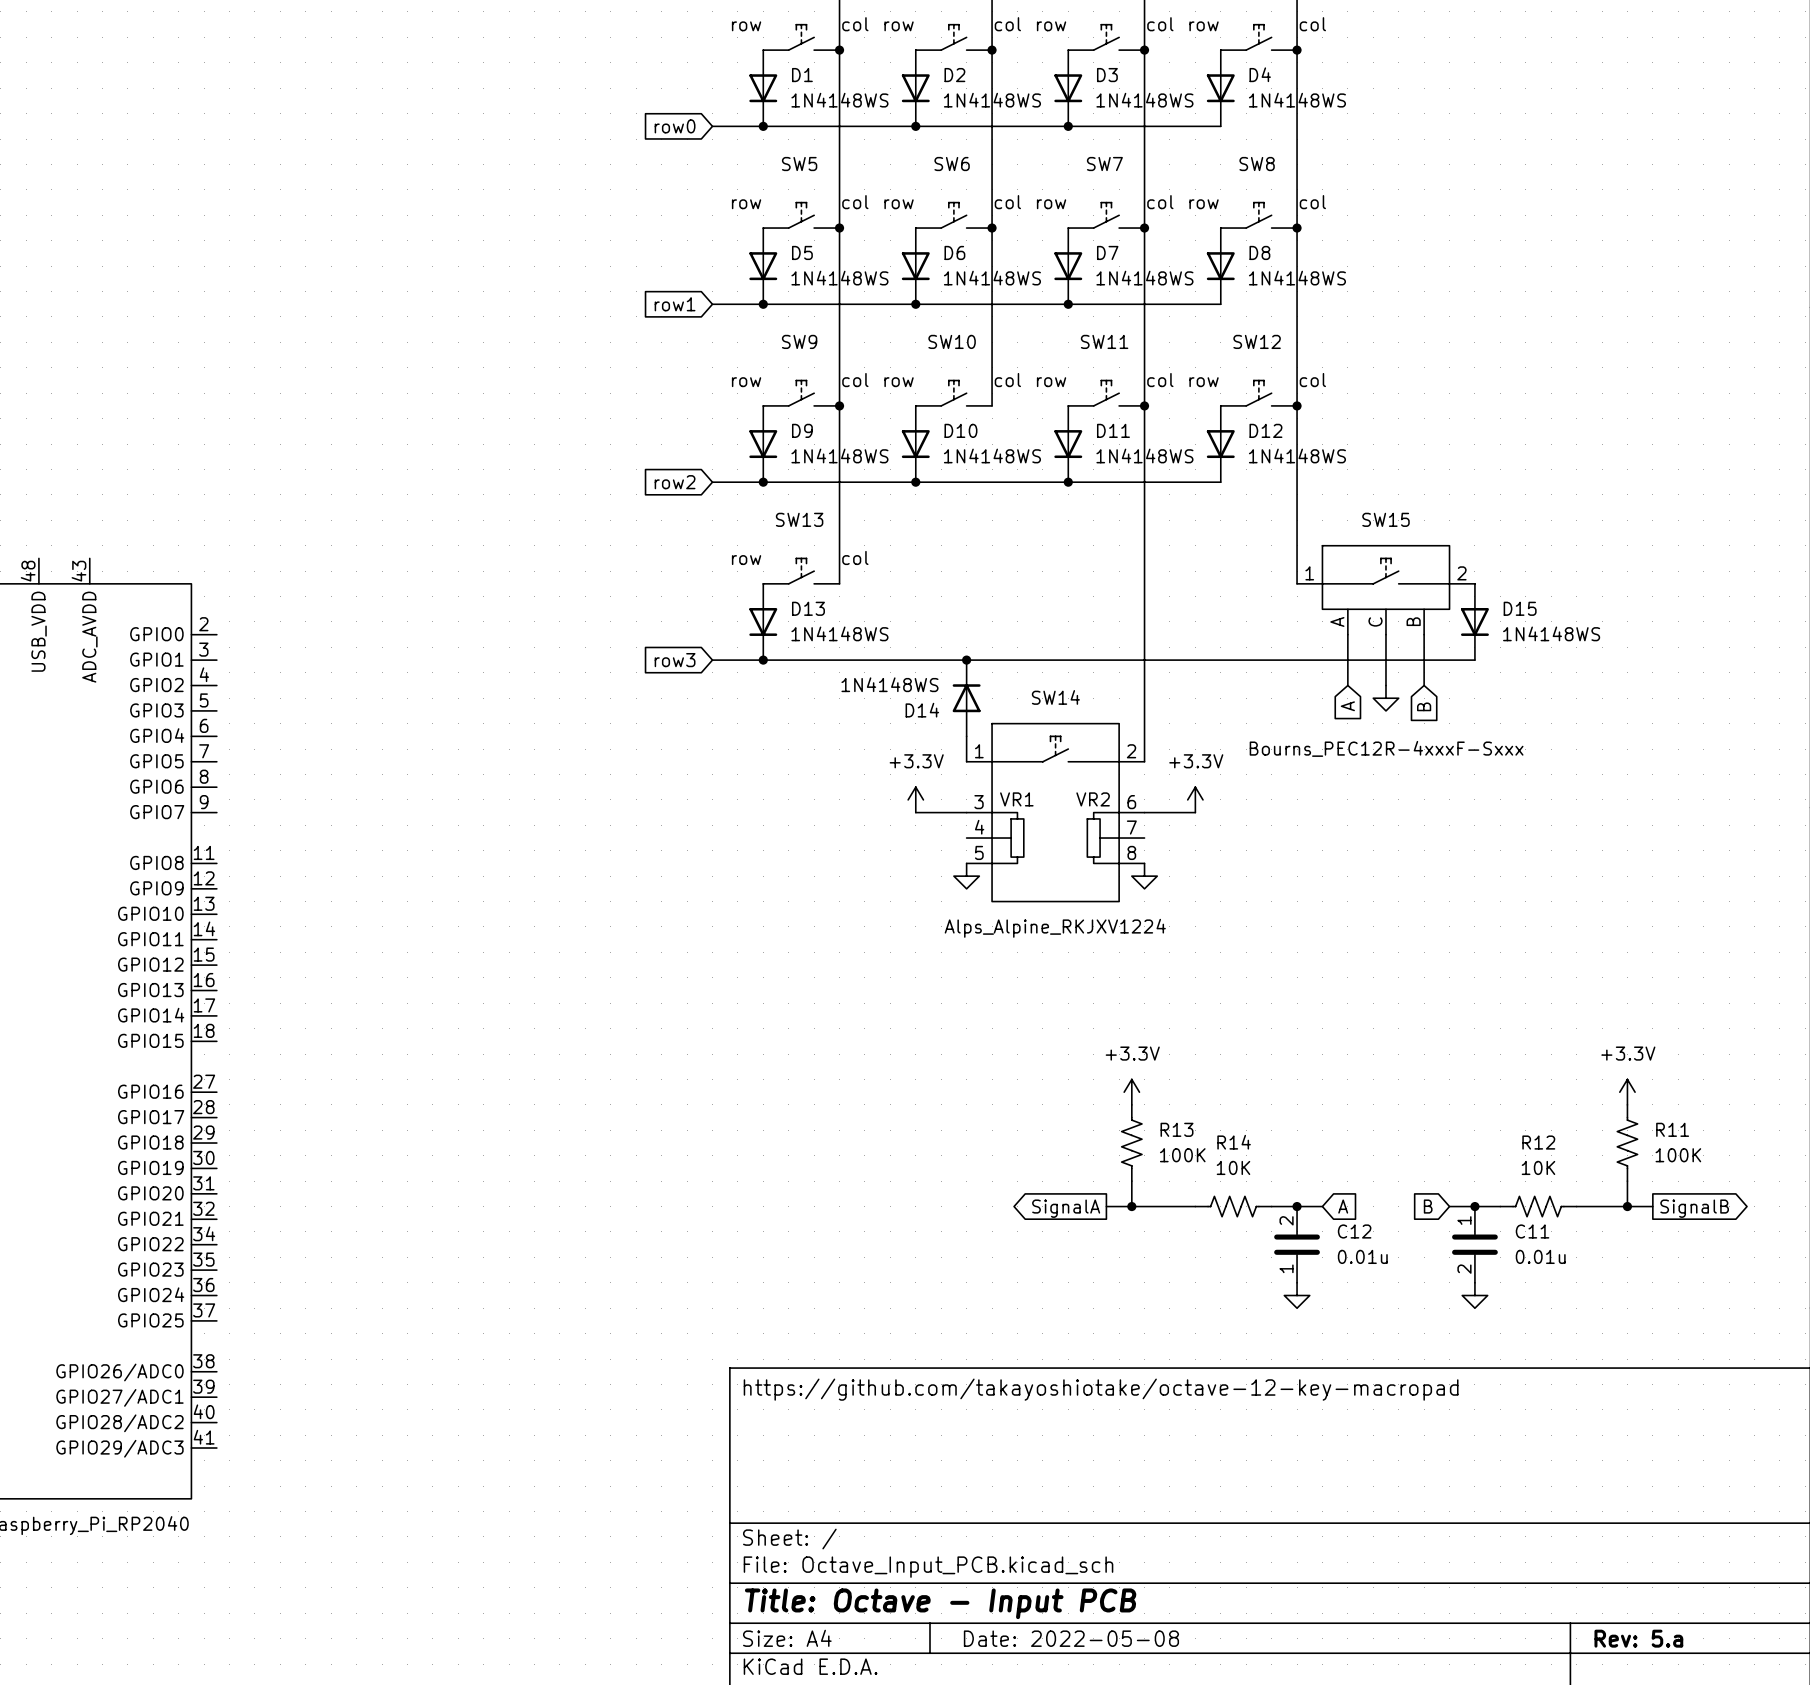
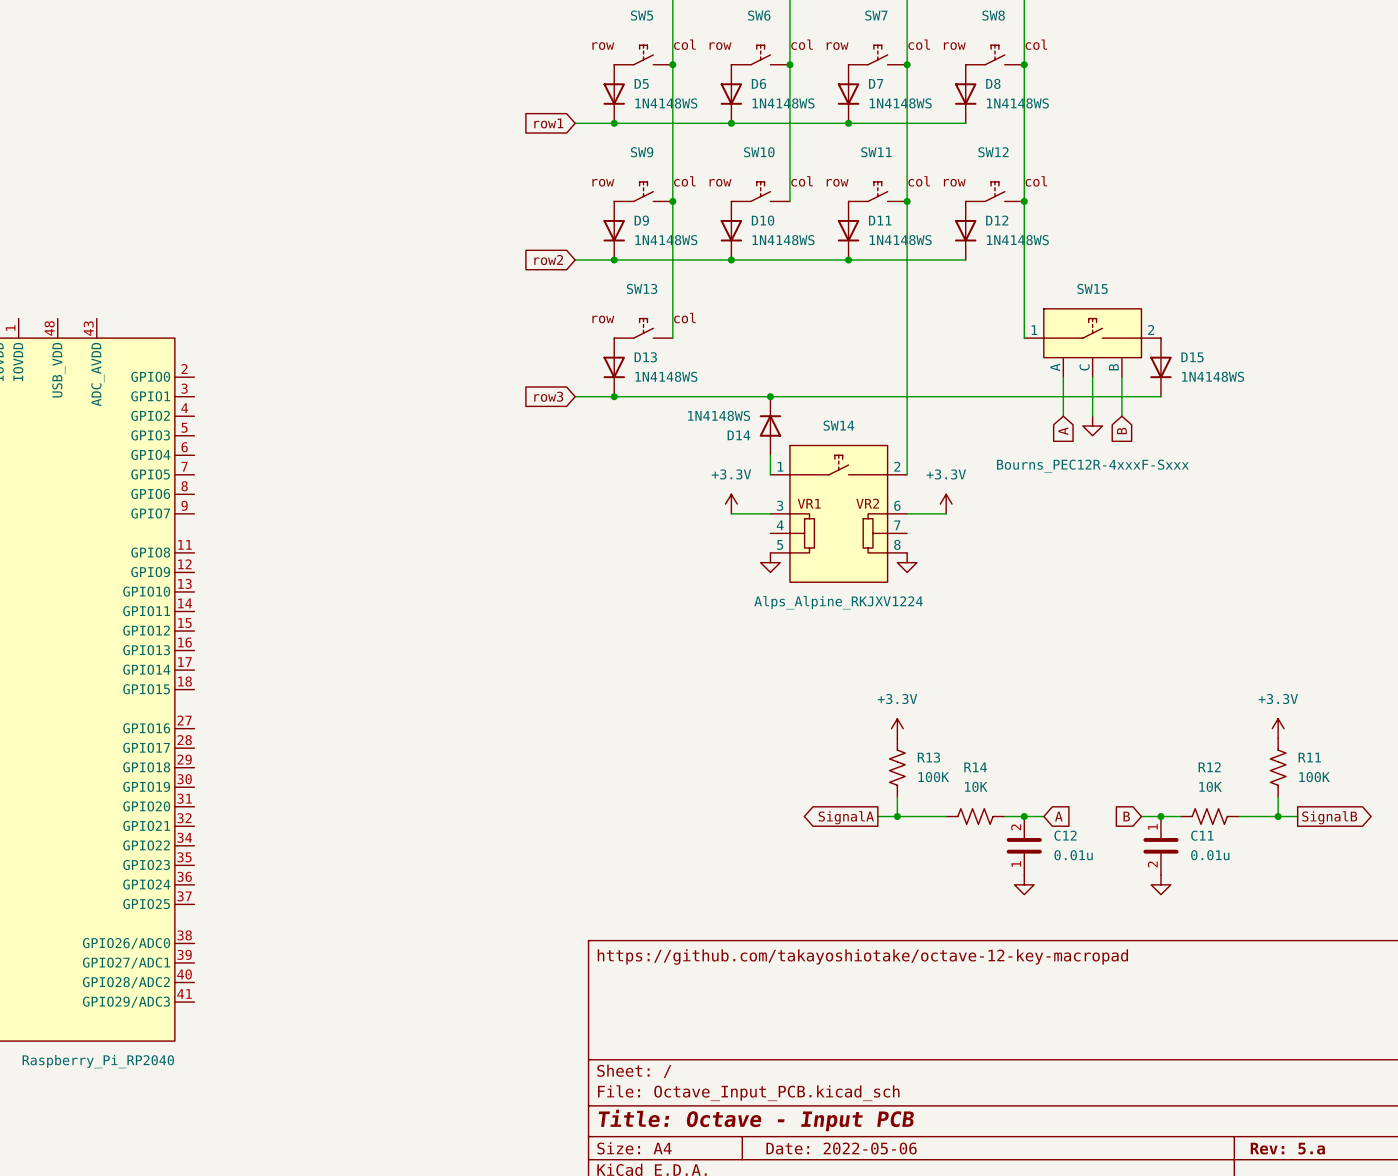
title block: Date: 2022-05-08 (1071, 1638) -> Date: 2022-05-06 (841, 1148)

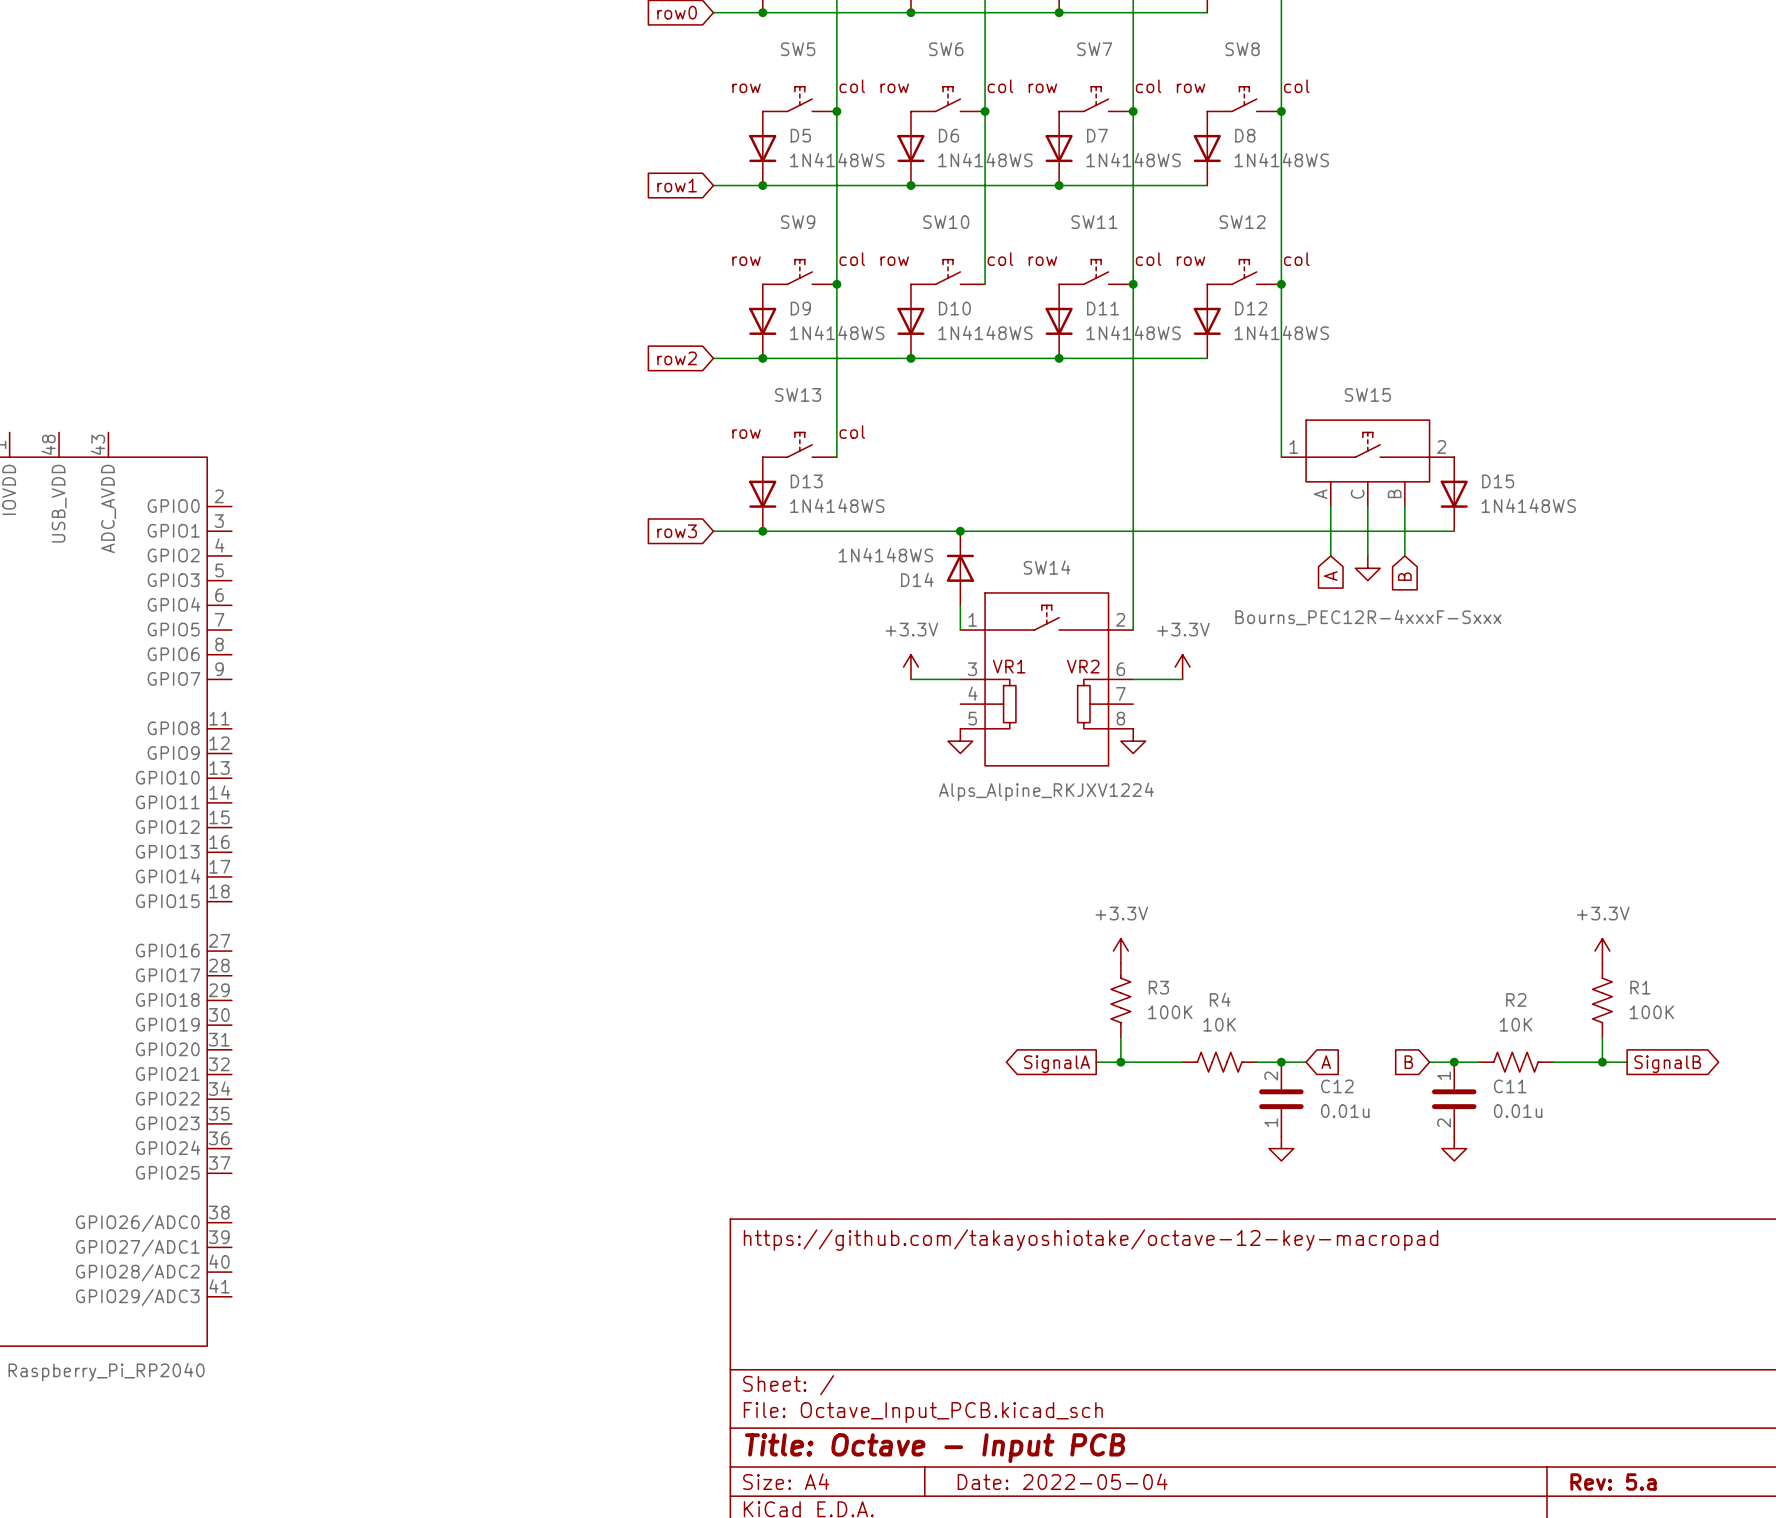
R13 name: R13 (928, 757) -> R3 (1158, 987)
R11 name: R11 (1309, 757) -> R1 (1640, 987)
R14 name: R14 (975, 767) -> R4 (1220, 999)
R12 name: R12 (1209, 767) -> R2 (1516, 999)
title block: Date: 2022-05-06 (841, 1148) -> Date: 2022-05-04 (1062, 1481)

